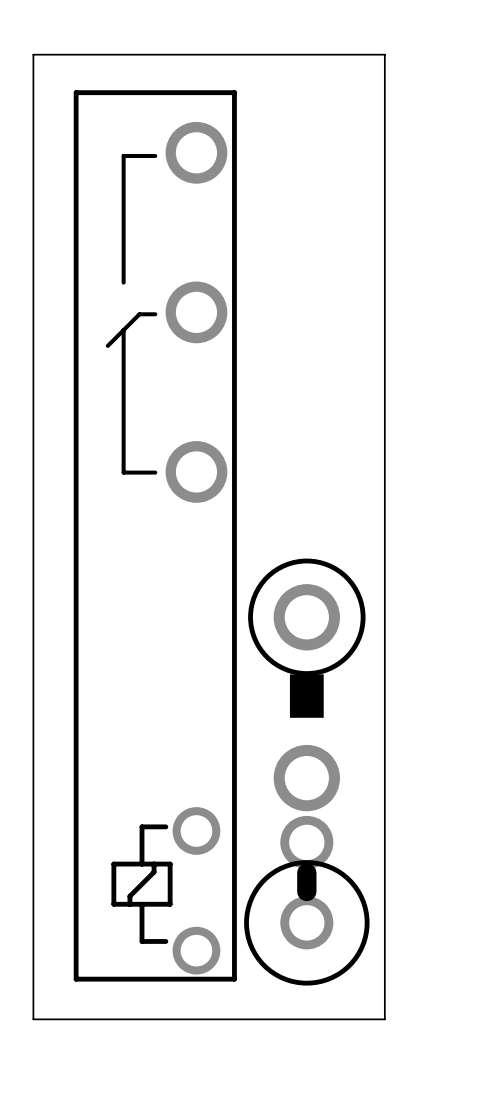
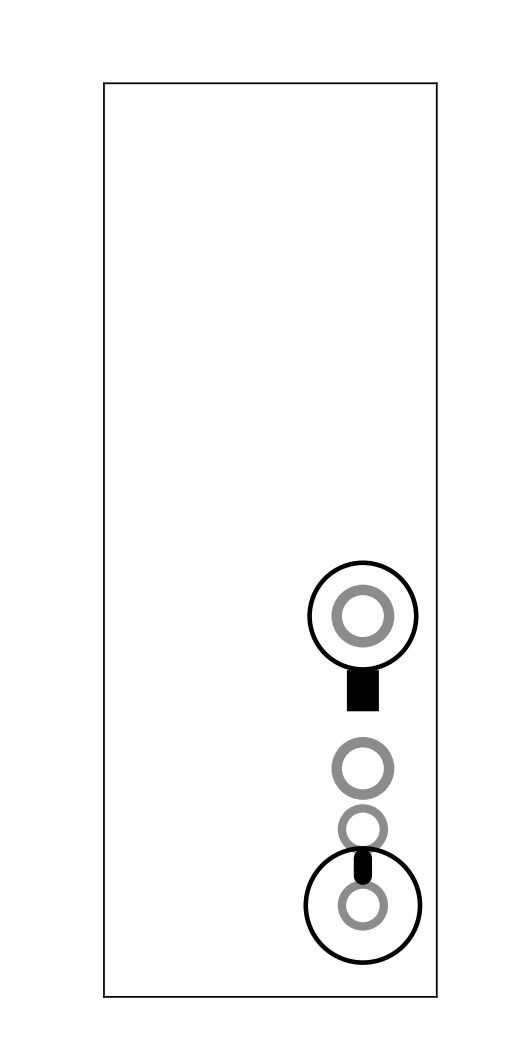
part: (155, 535) -> none

